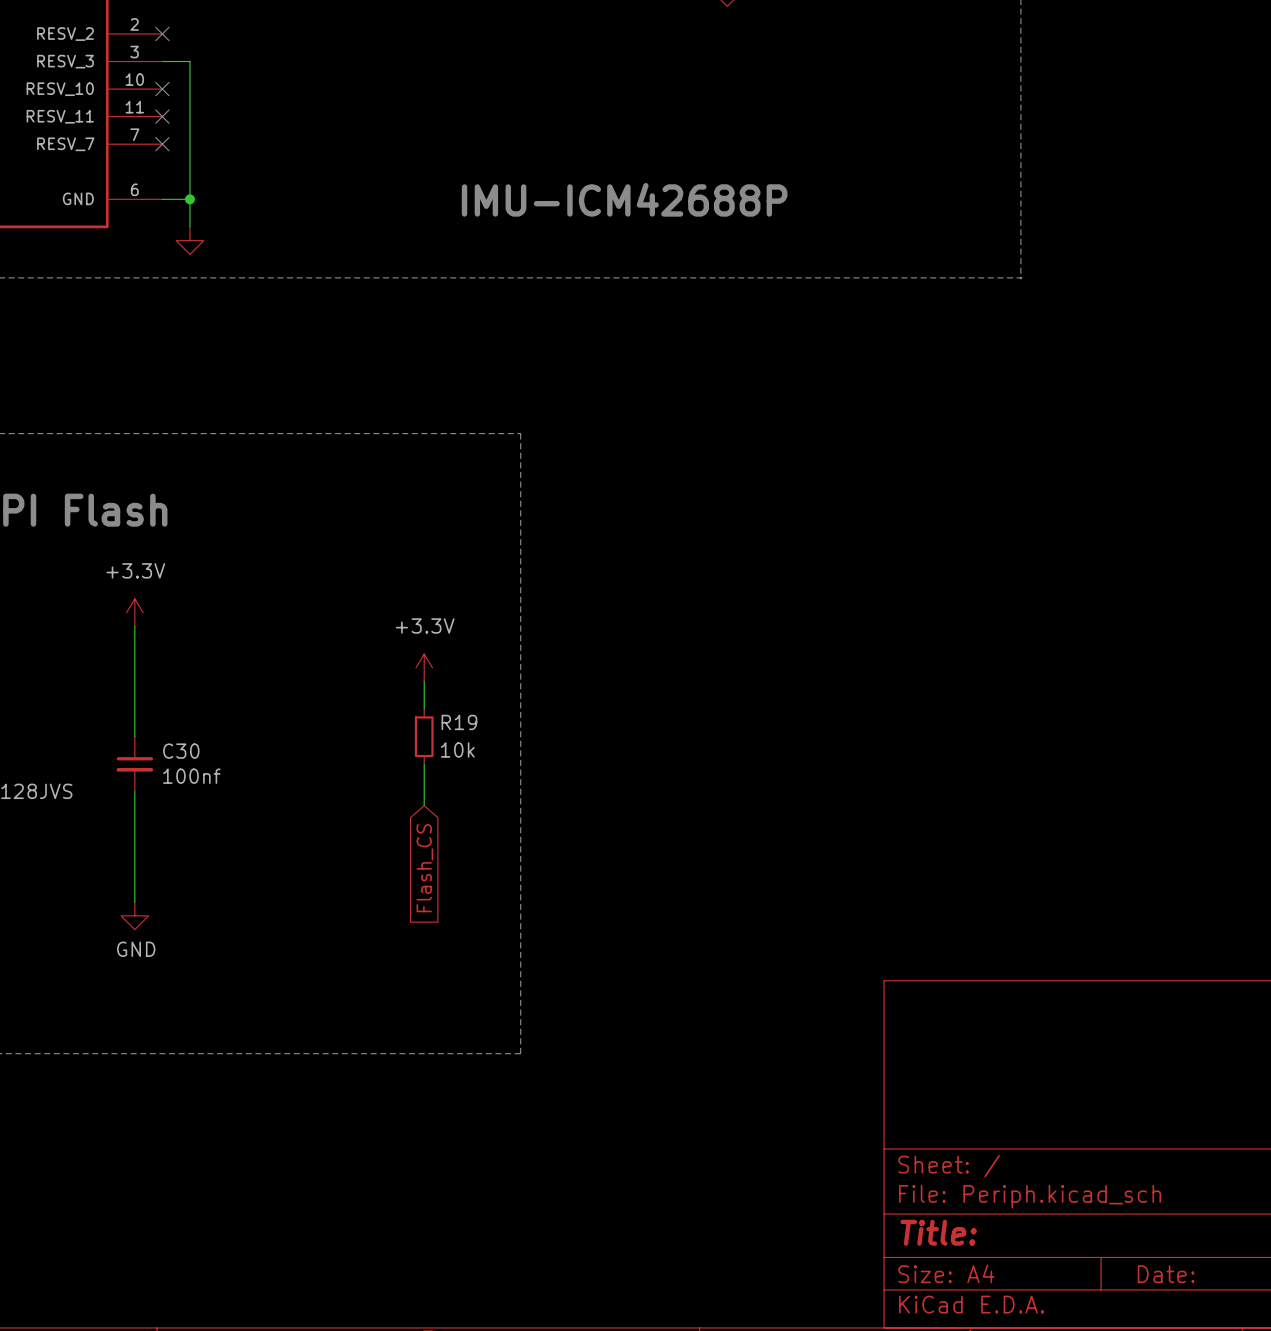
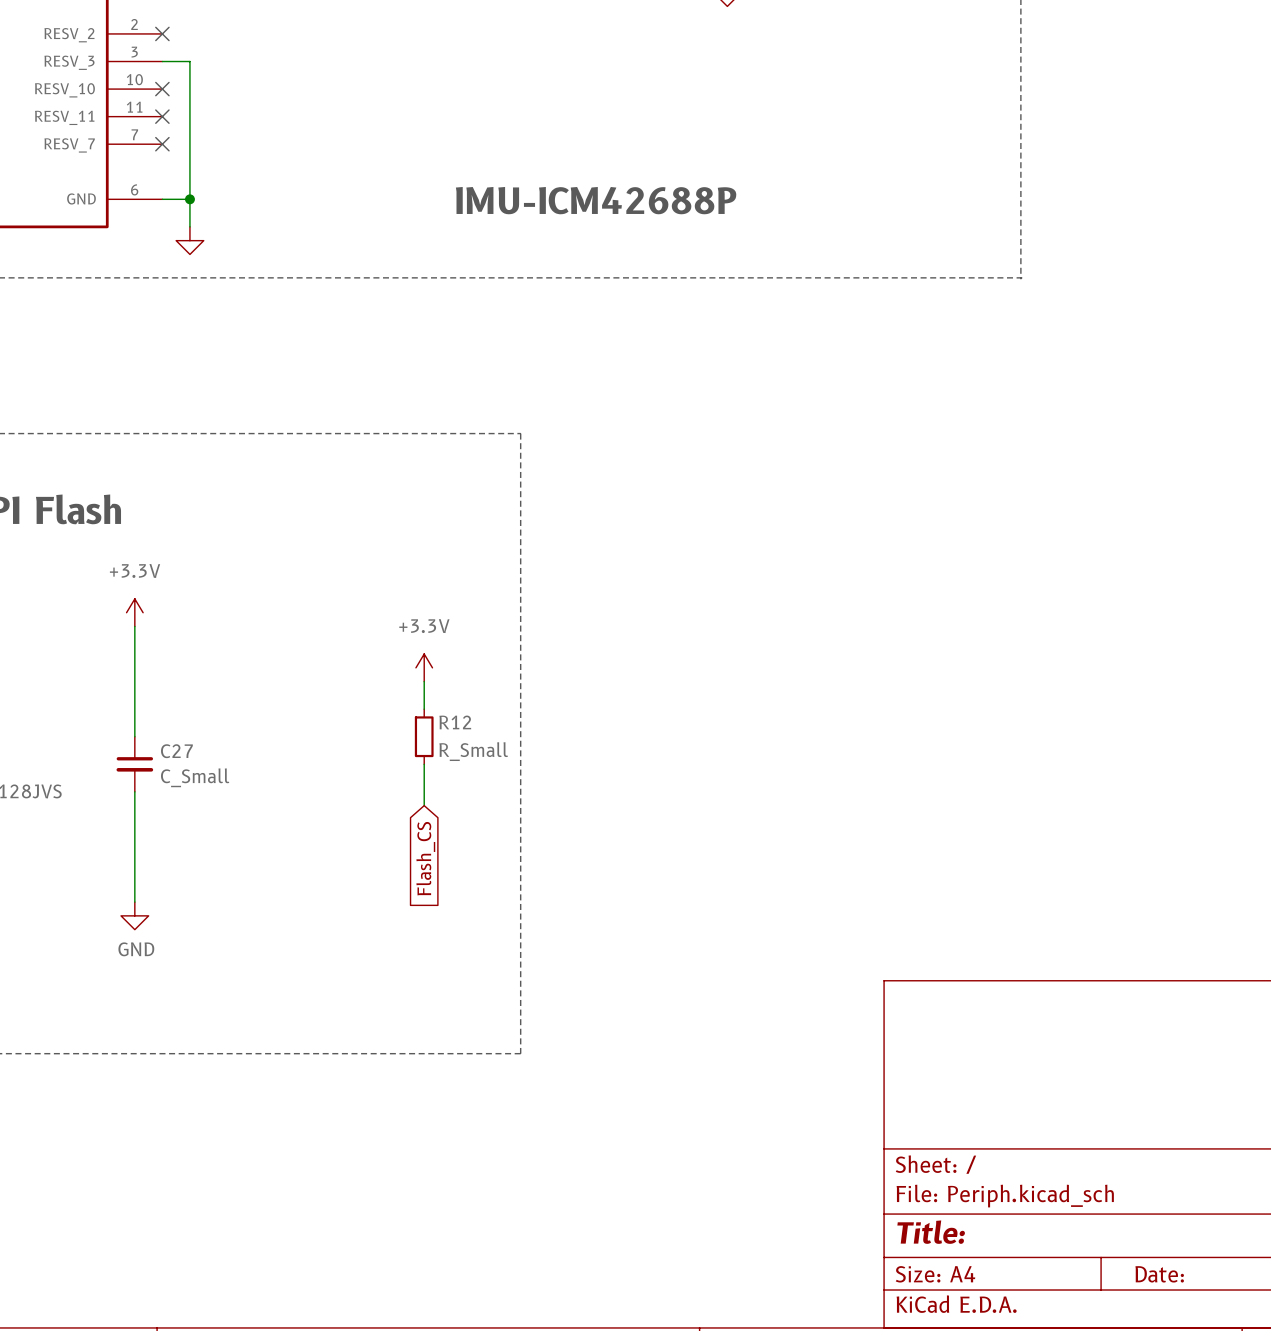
R19 name: R19 (459, 722) -> R12 (455, 722)
R19 value: 10k (457, 750) -> R_Small (473, 751)
C30 name: C30 (181, 751) -> C27 (176, 751)
C30 value: 100nf (191, 776) -> C_Small (195, 777)

